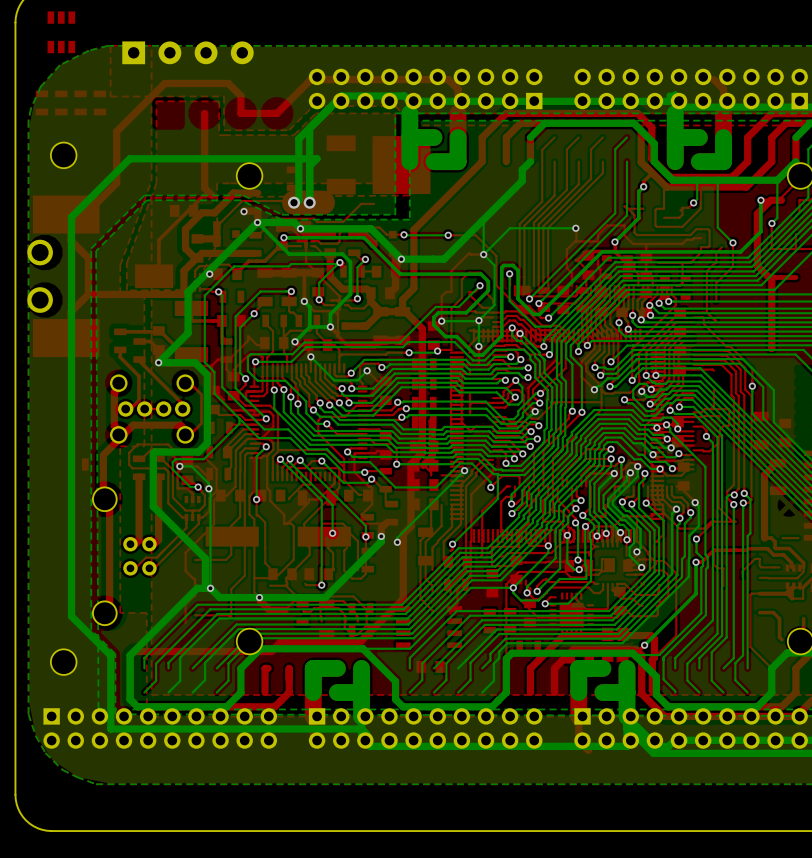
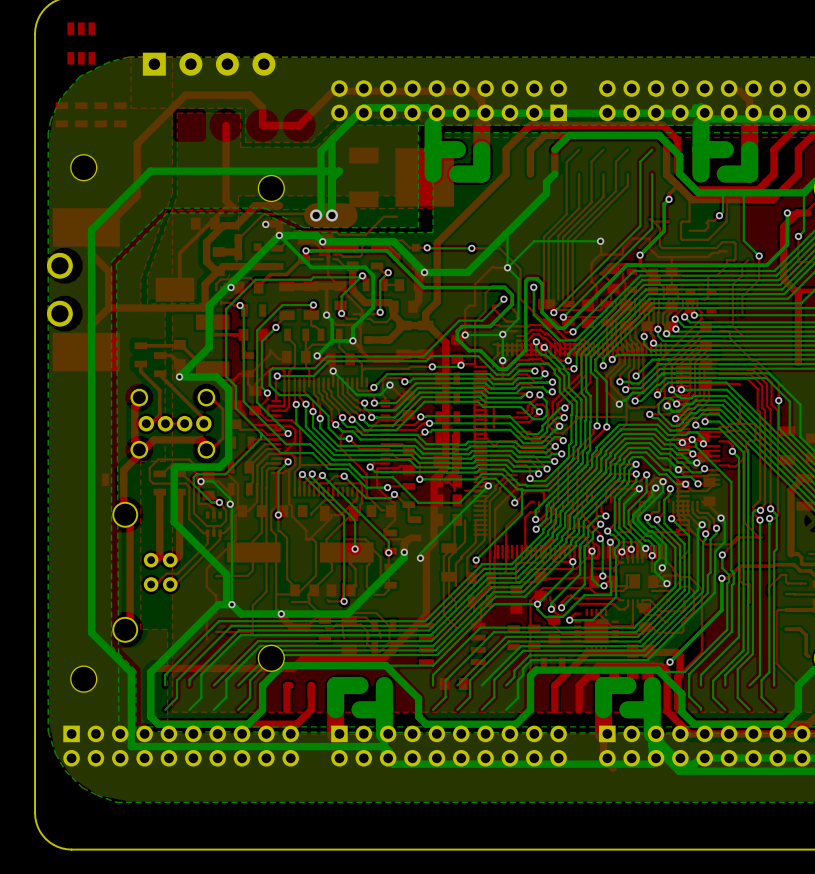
part: (292, 178) -> none

